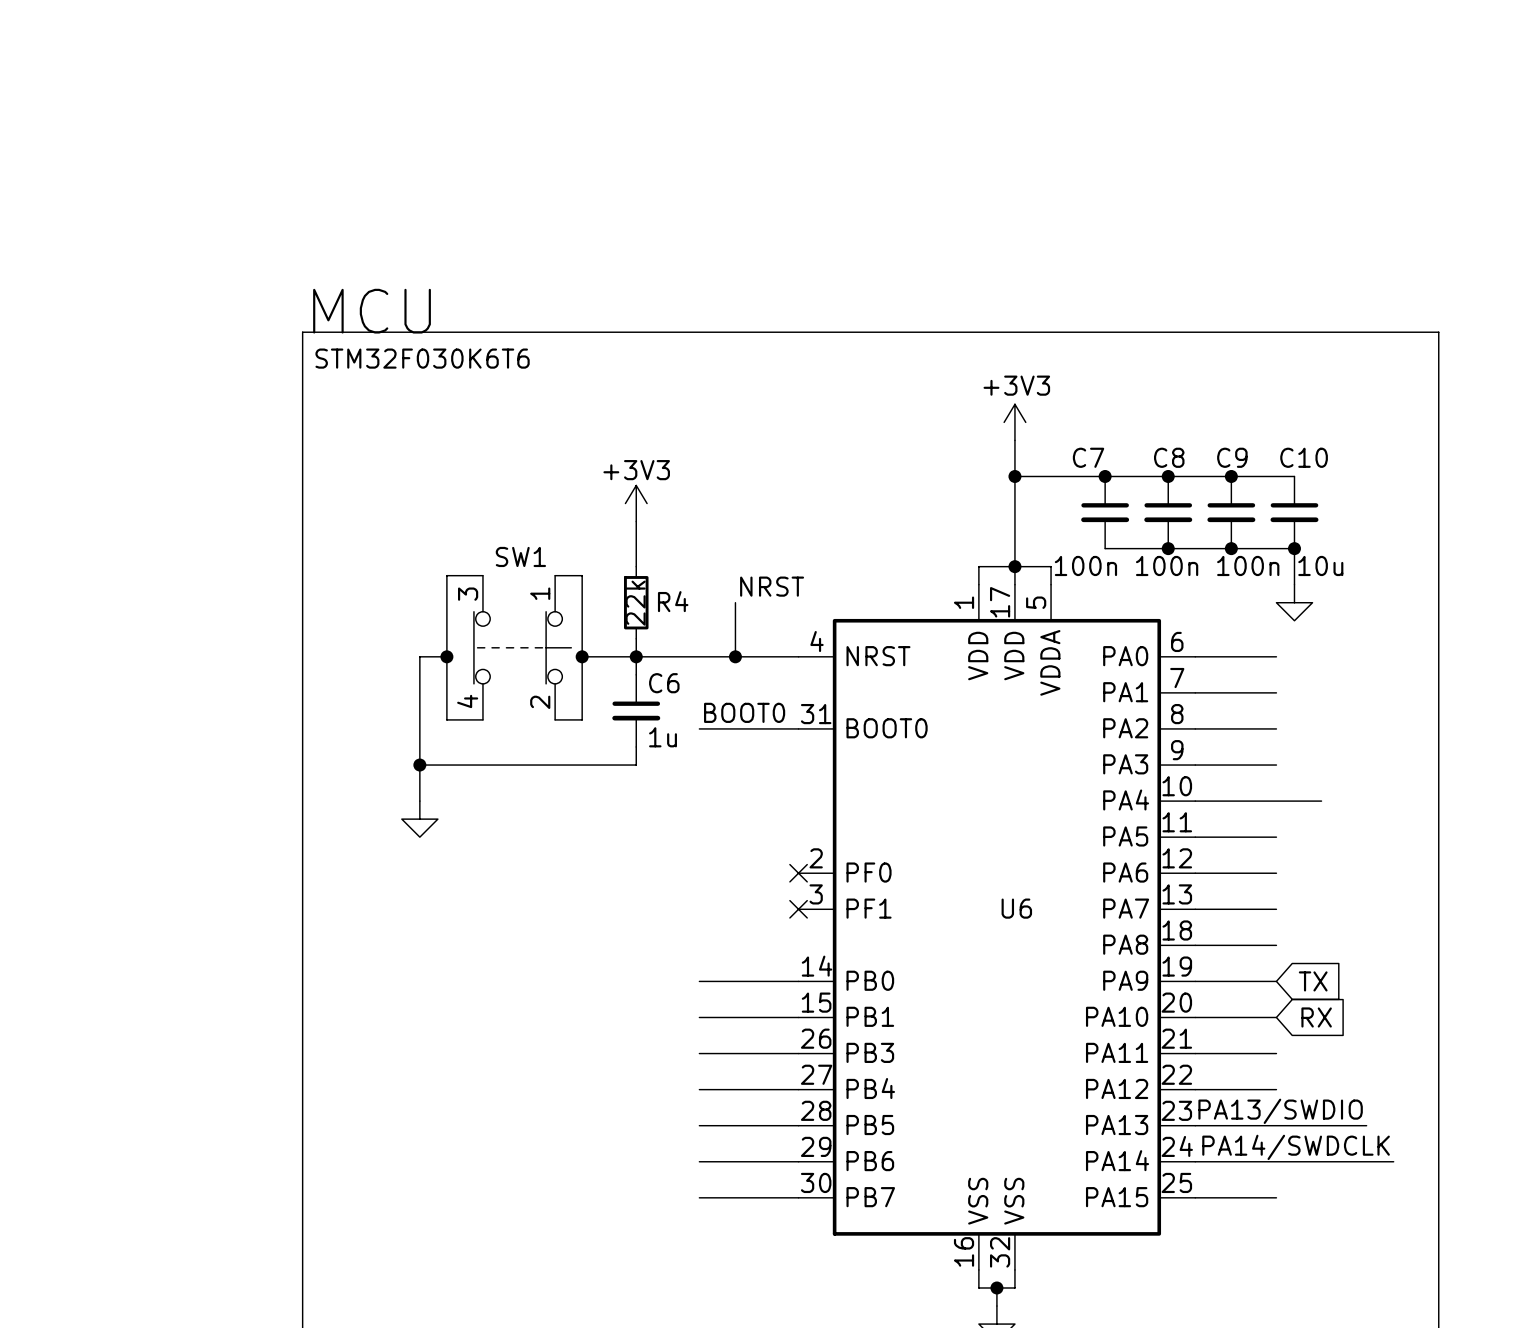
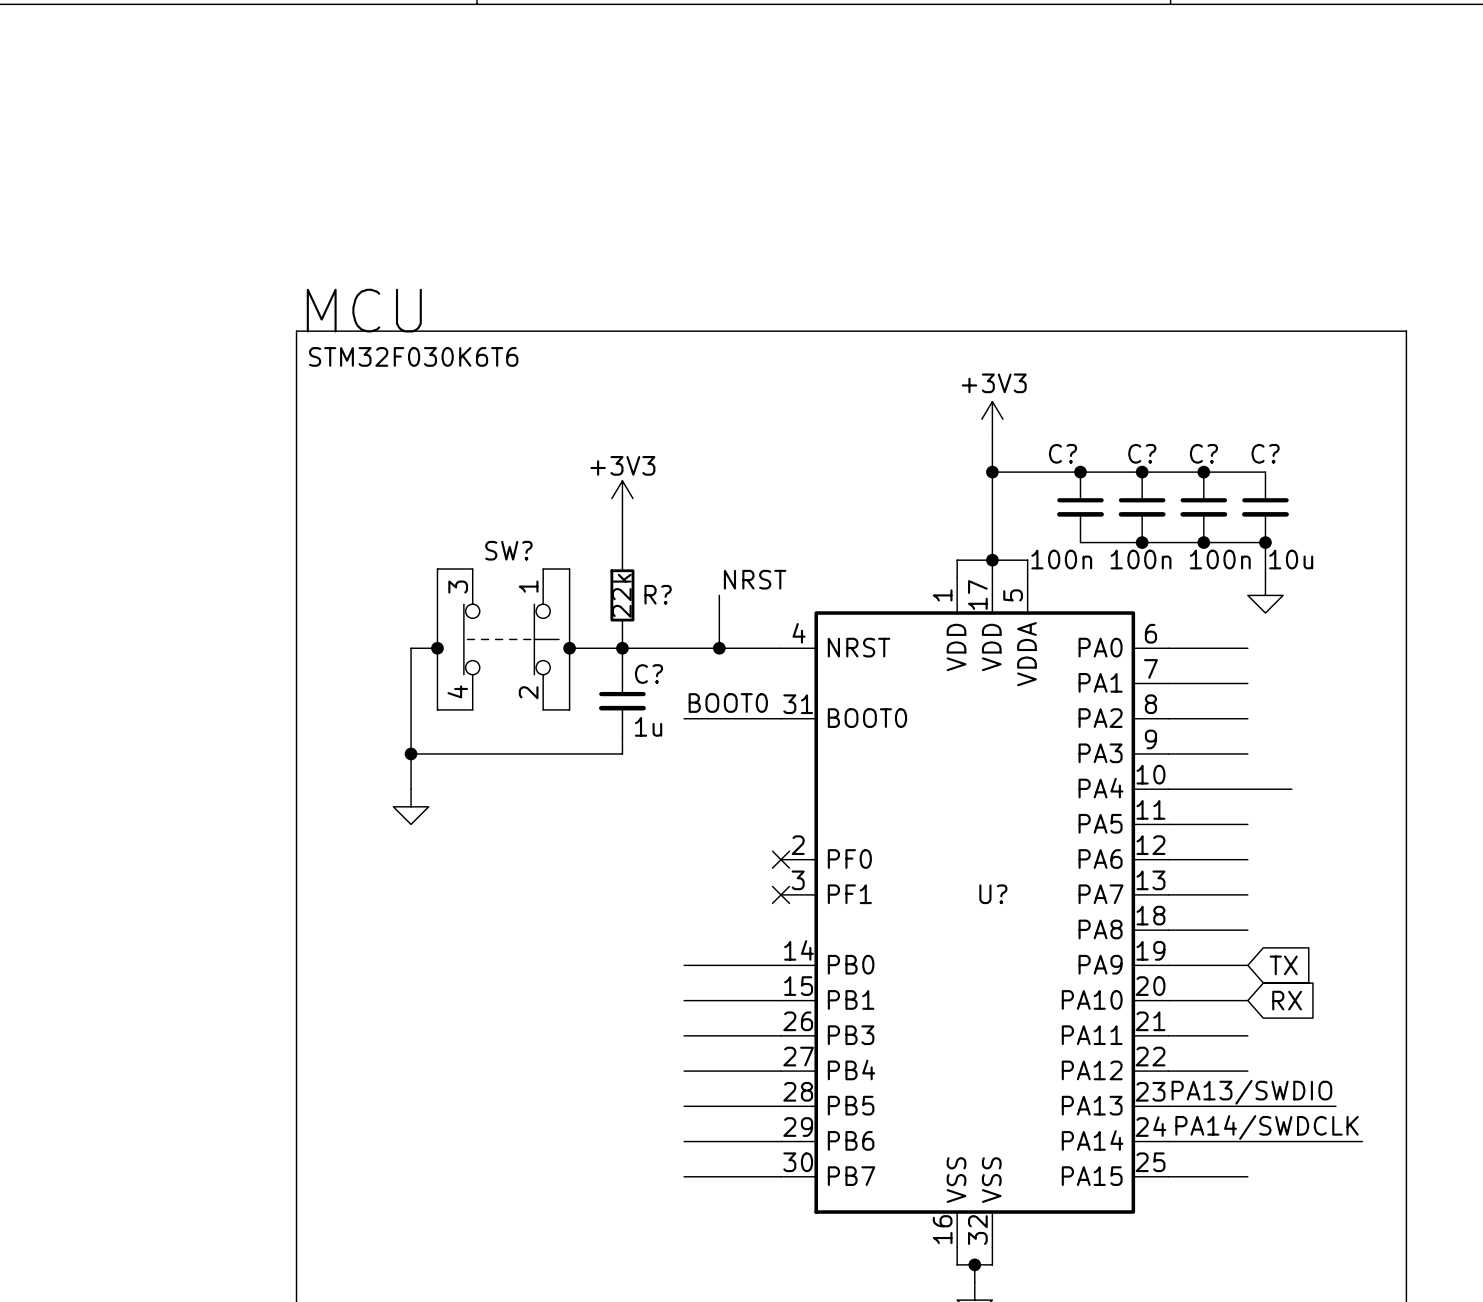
C7 name: C7 (1088, 457) -> C? (1063, 453)
C8 name: C8 (1169, 457) -> C? (1142, 453)
C9 name: C9 (1232, 457) -> C? (1203, 453)
C10 name: C10 (1304, 457) -> C? (1265, 453)
SW1 name: SW1 (520, 556) -> SW? (508, 550)
R4 name: R4 (673, 601) -> R? (658, 594)
C6 name: C6 (664, 683) -> C? (649, 674)
U6 name: U6 (1016, 908) -> U? (993, 894)

